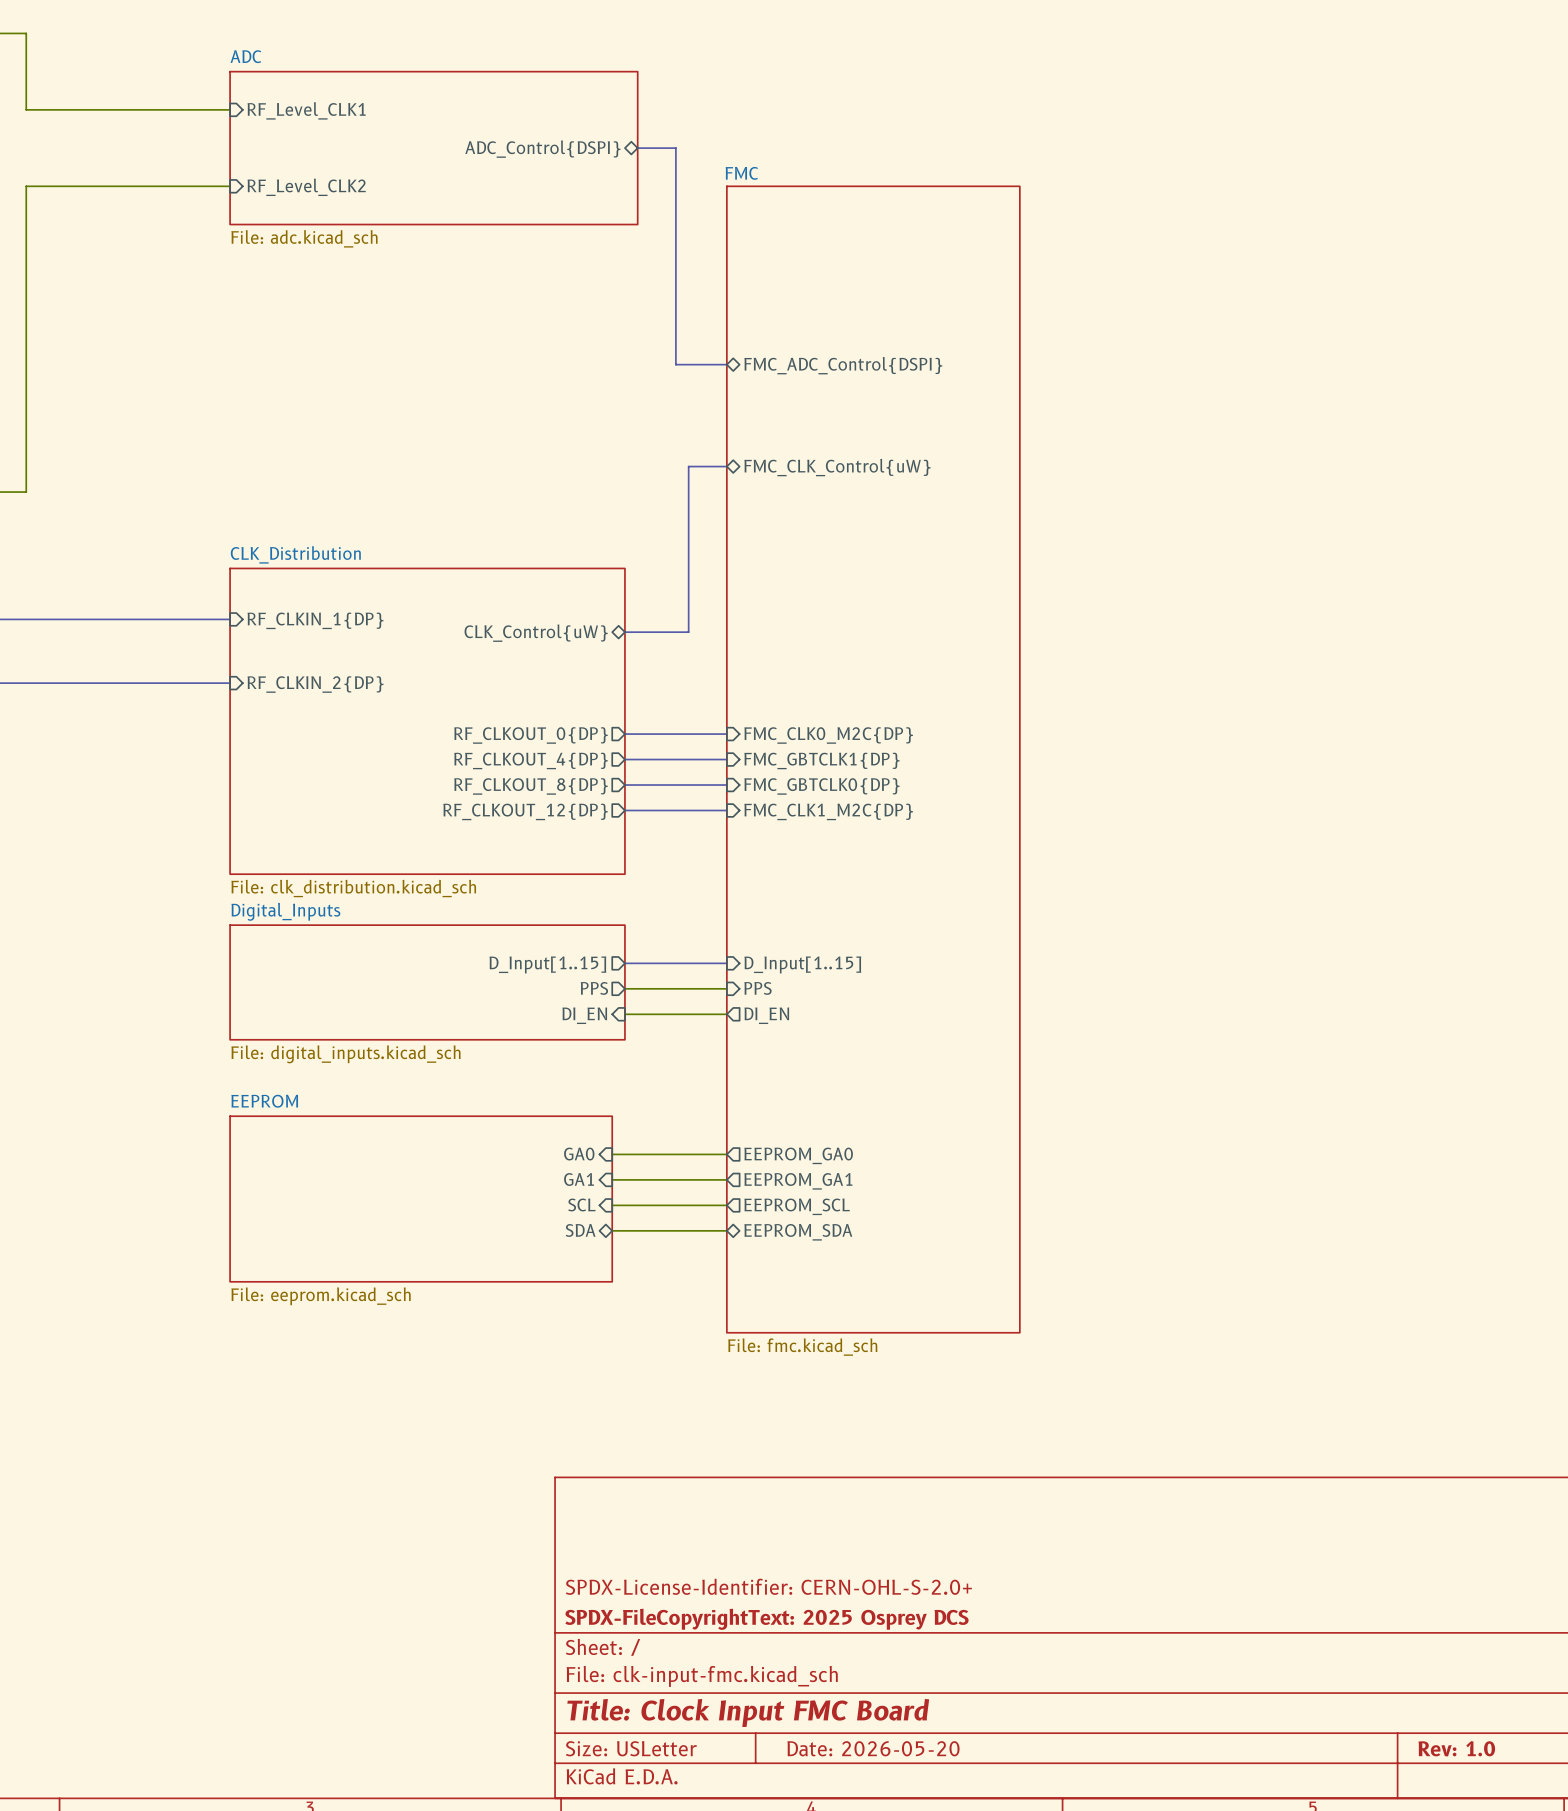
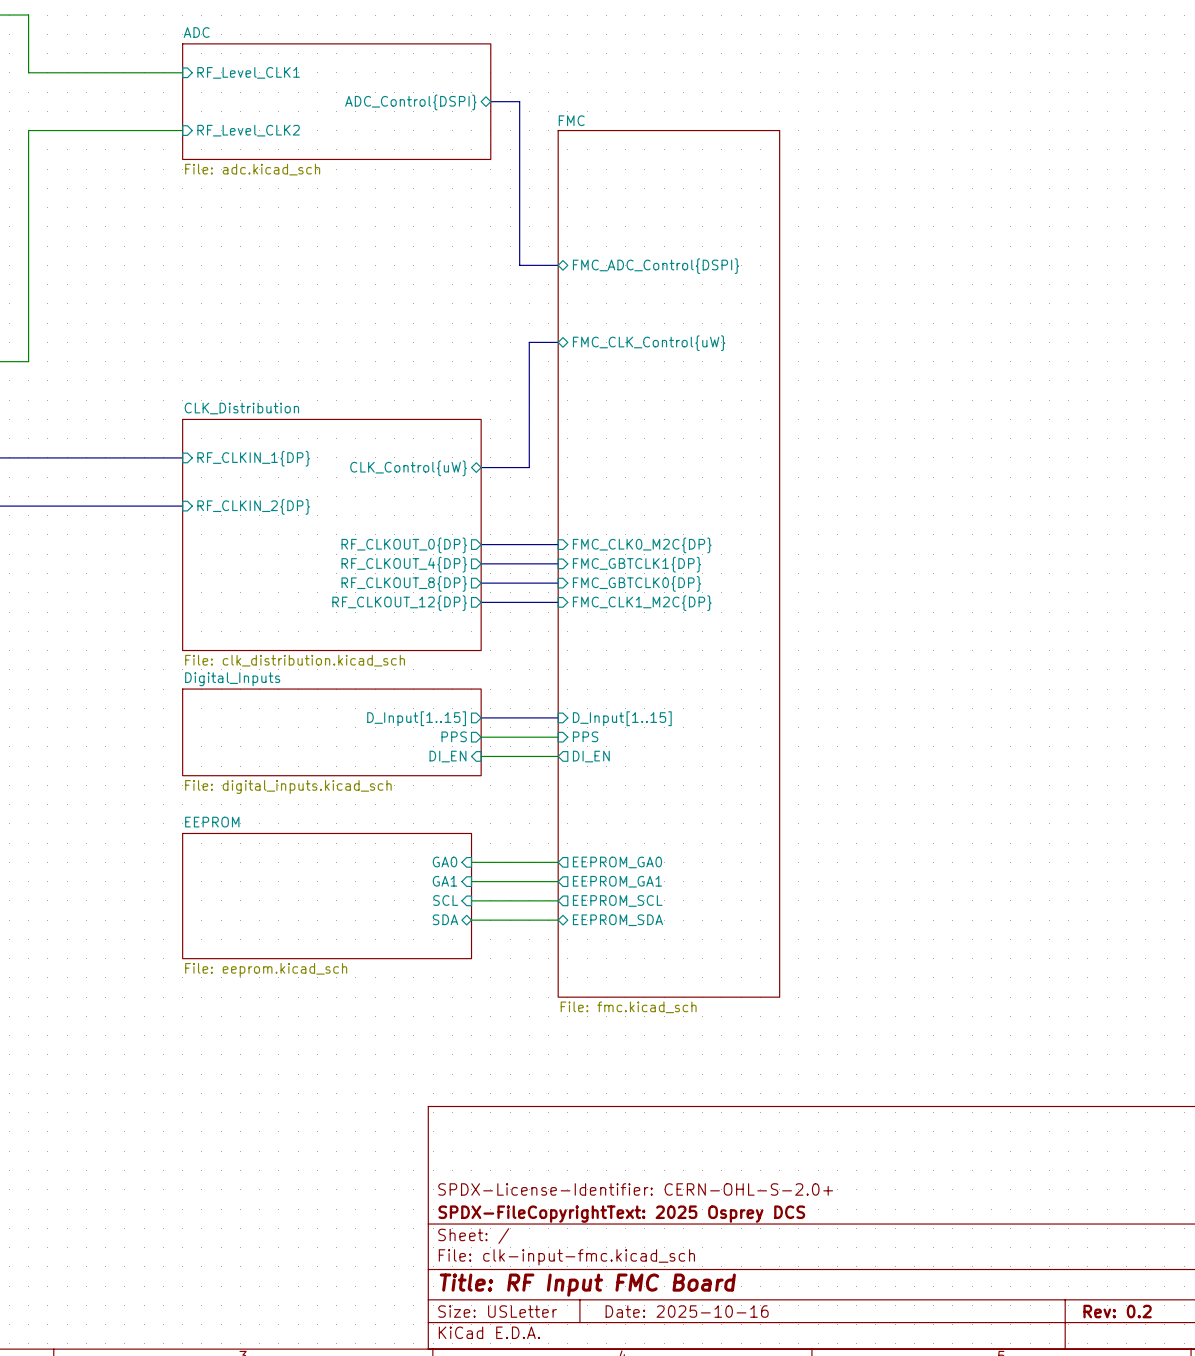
title block: Title: Clock Input FMC Board (748, 1712) -> Title: RF Input FMC Board (587, 1285)
title block: Date: 2026-05-20 (873, 1748) -> Date: 2025-10-16 (687, 1311)
title block: Rev: 1.0 (1456, 1748) -> Rev: 0.2 (1117, 1311)

